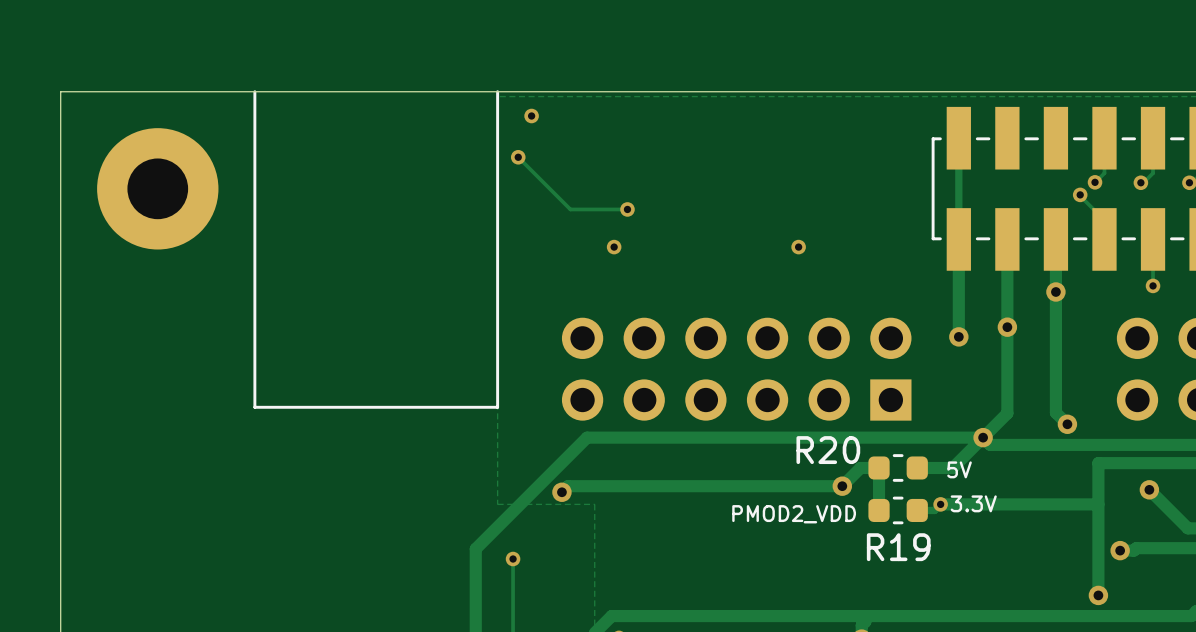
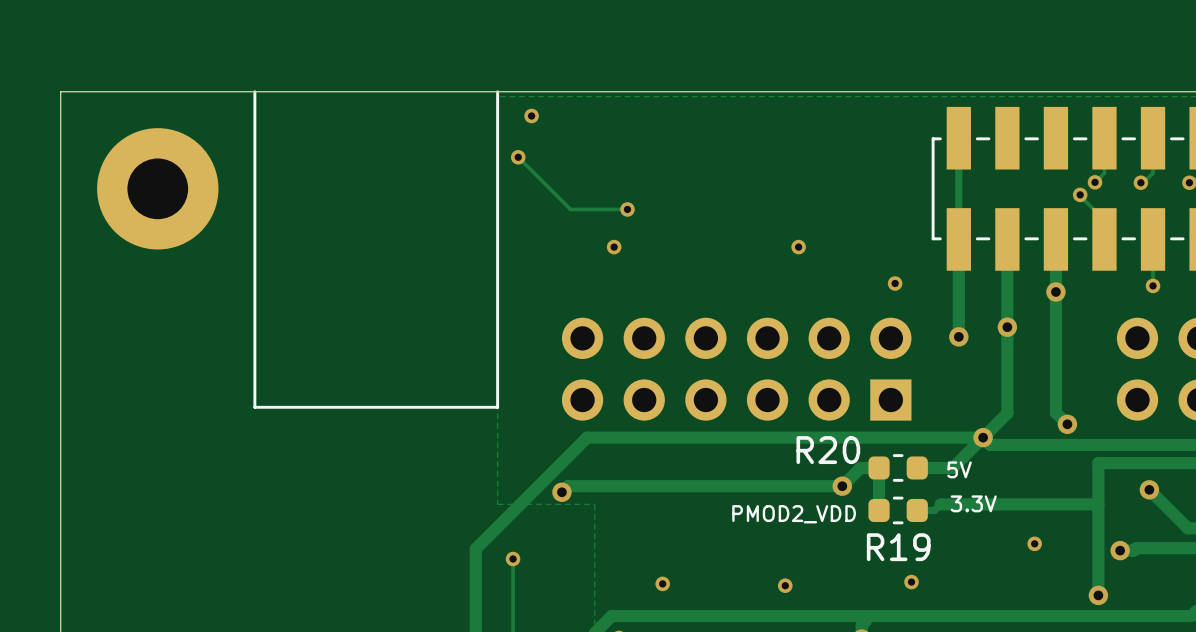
via: none -> (895, 283)
via: (940, 504) -> none
via: none -> (1034, 543)
via: none -> (911, 582)
via: none -> (662, 583)
via: none -> (785, 585)

